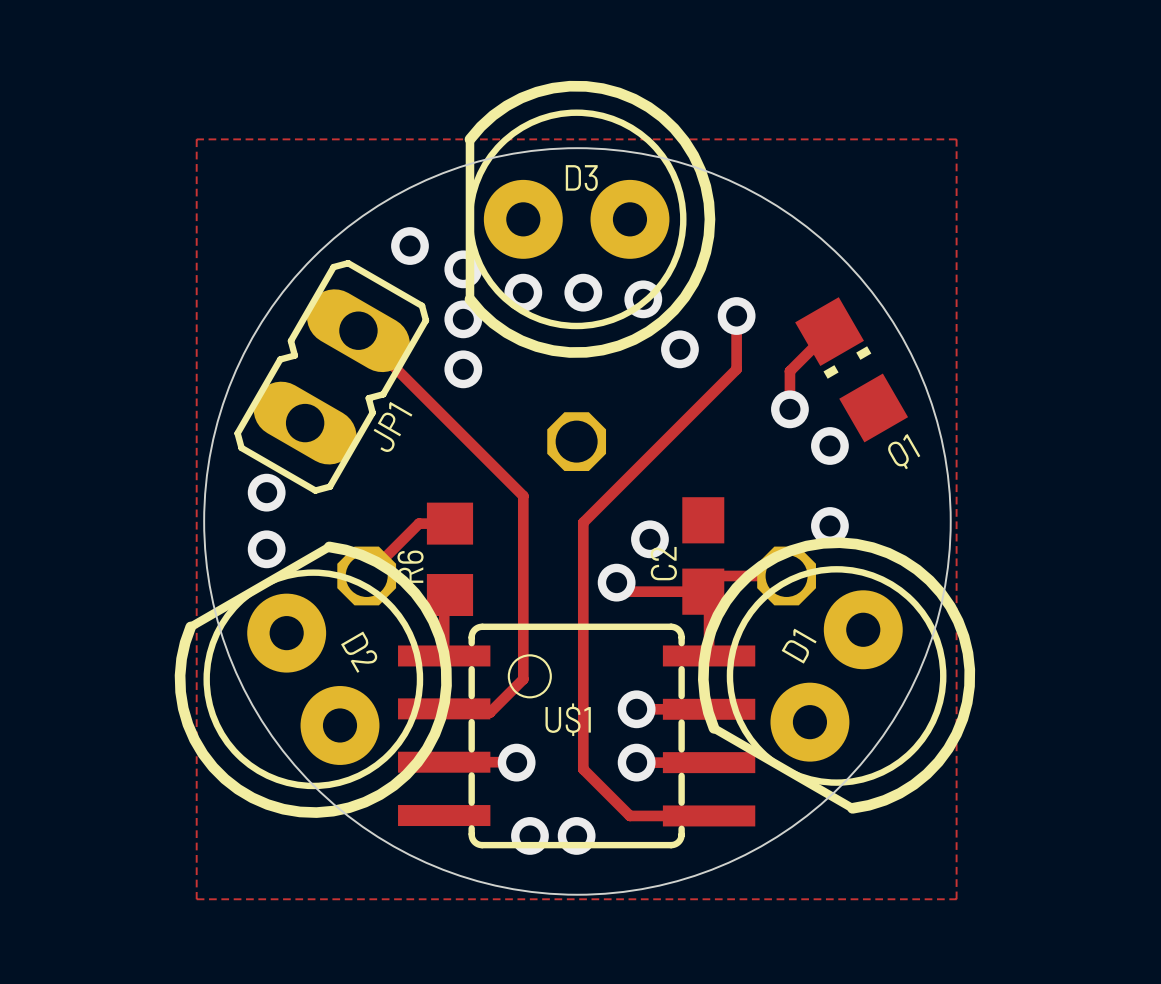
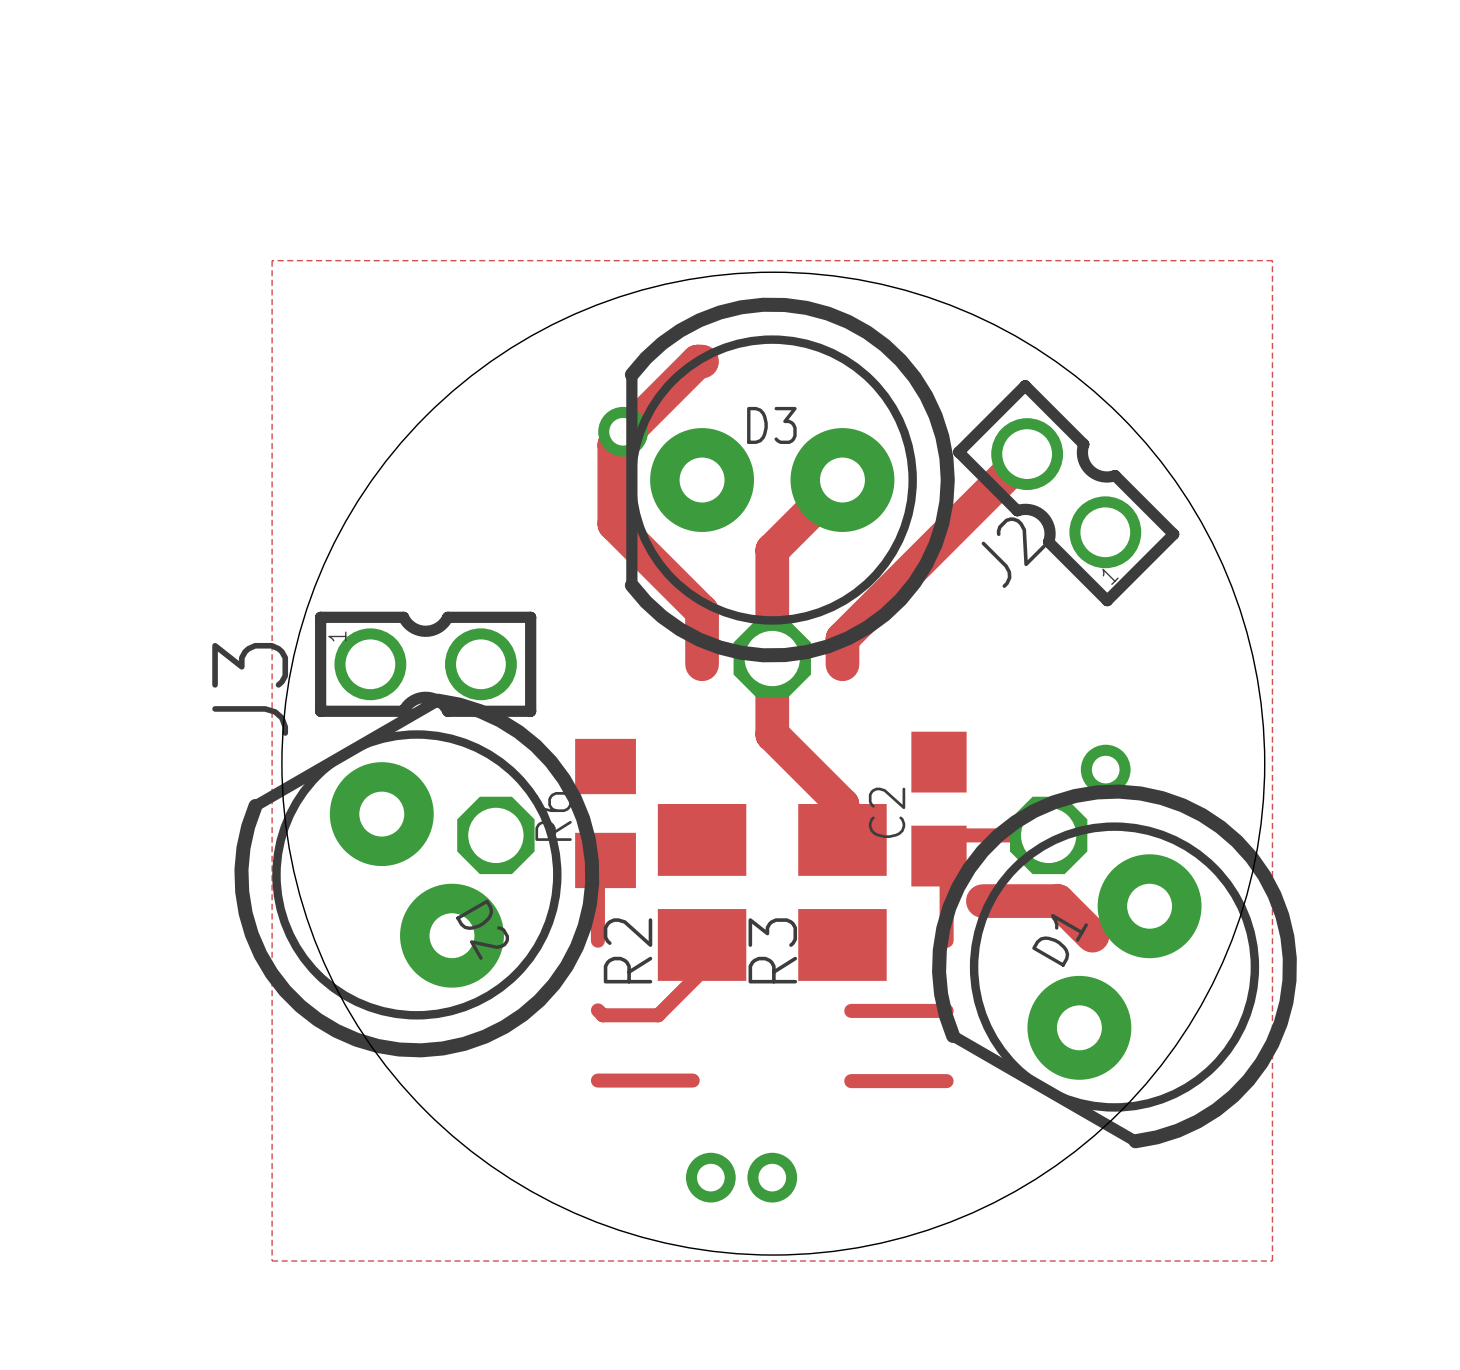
track: none -> (702, 361) (697, 361) (614, 444) (614, 523) (702, 611) (702, 664)
D3 position: (589, 219) -> (789, 480)
via: (409, 246) -> none
track: none -> (1027, 454) (842, 638) (842, 664)
via: (523, 292) -> none
via: (583, 292) -> none
via: (643, 299) -> none
track: none -> (842, 480) (772, 550) (772, 734) (842, 804) (842, 839)
track: (736, 316) (736, 369) (583, 522) (583, 769) (629, 815) (709, 815) -> none
via: (736, 316) -> none
J2: none -> (1066, 493)
via: (463, 319) -> none
track: (358, 331) (523, 495) (523, 659) -> none
track: (829, 331) (789, 371) (789, 409) -> none
via: (679, 349) -> none
via: (463, 369) -> none
Q1: (851, 369) -> none
JP1: (331, 376) -> none
via: (789, 409) -> none
J3: none -> (425, 664)
via: (829, 445) -> none
via: (266, 492) -> none
track: (449, 523) (419, 523) (366, 575) -> none
via: (649, 539) -> none
via: (266, 549) -> none
track: (616, 582) (625, 591) (703, 591) -> none
via: (616, 582) -> none
R2: none -> (702, 892)
R3: none -> (842, 892)
track: none -> (982, 901) (1057, 901) (1092, 935)
D2 position: (313, 679) -> (416, 875)
via: (636, 709) -> none
U$1: (576, 735) -> none
via: (516, 762) -> none
via: (636, 762) -> none

